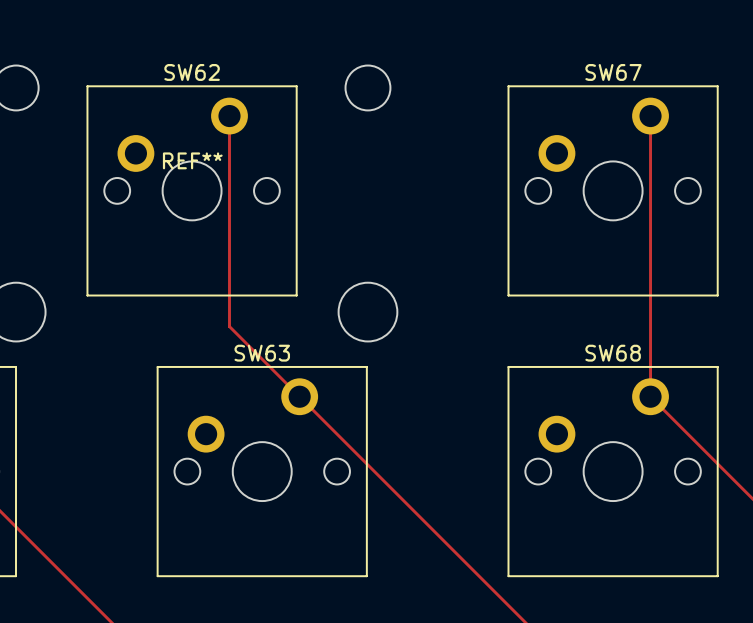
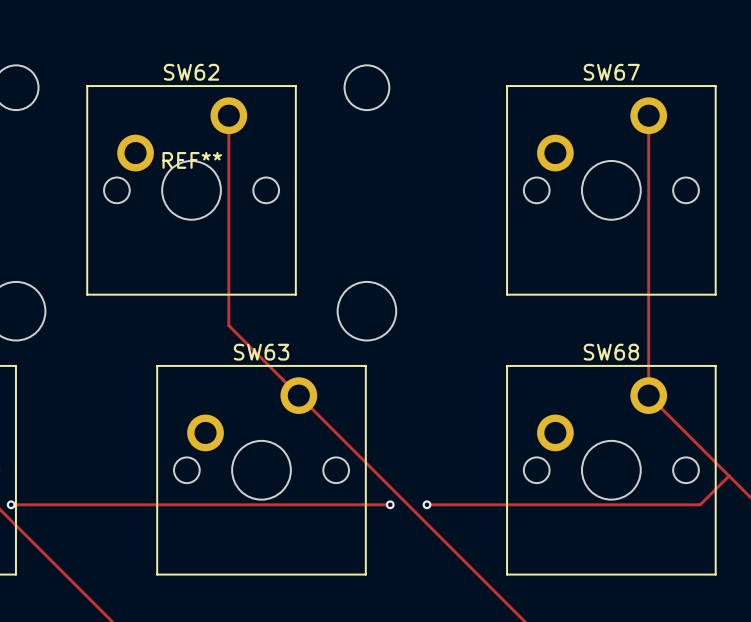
track: none -> (729, 475) (700, 504) (426, 504)
track: none -> (11, 504) (390, 504)
via: none -> (11, 504)
via: none -> (390, 504)
via: none -> (426, 504)

